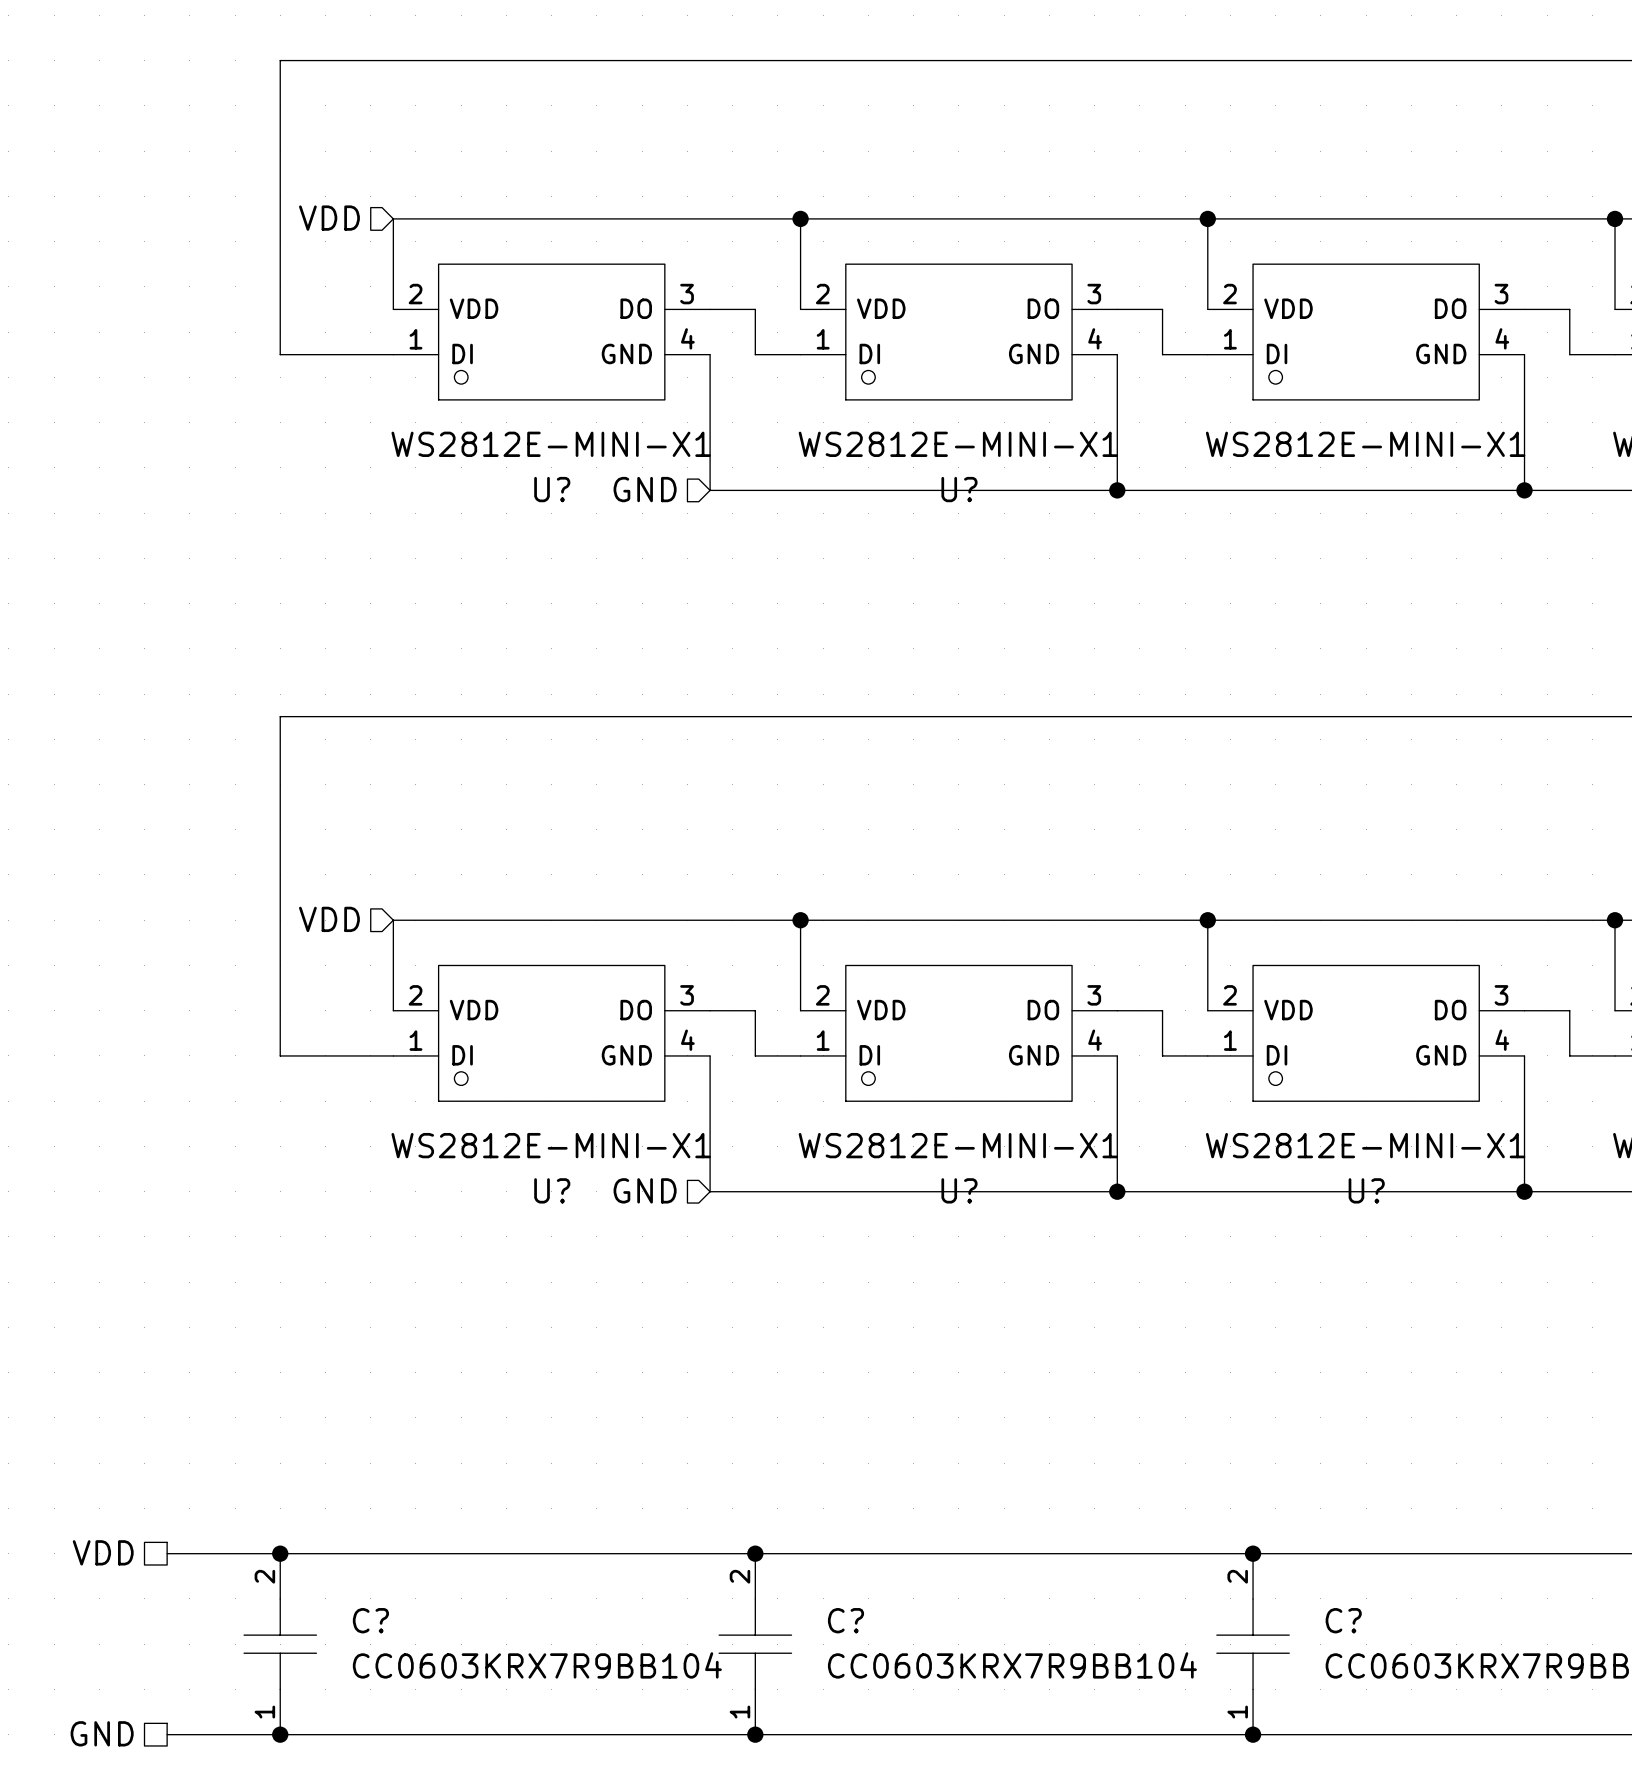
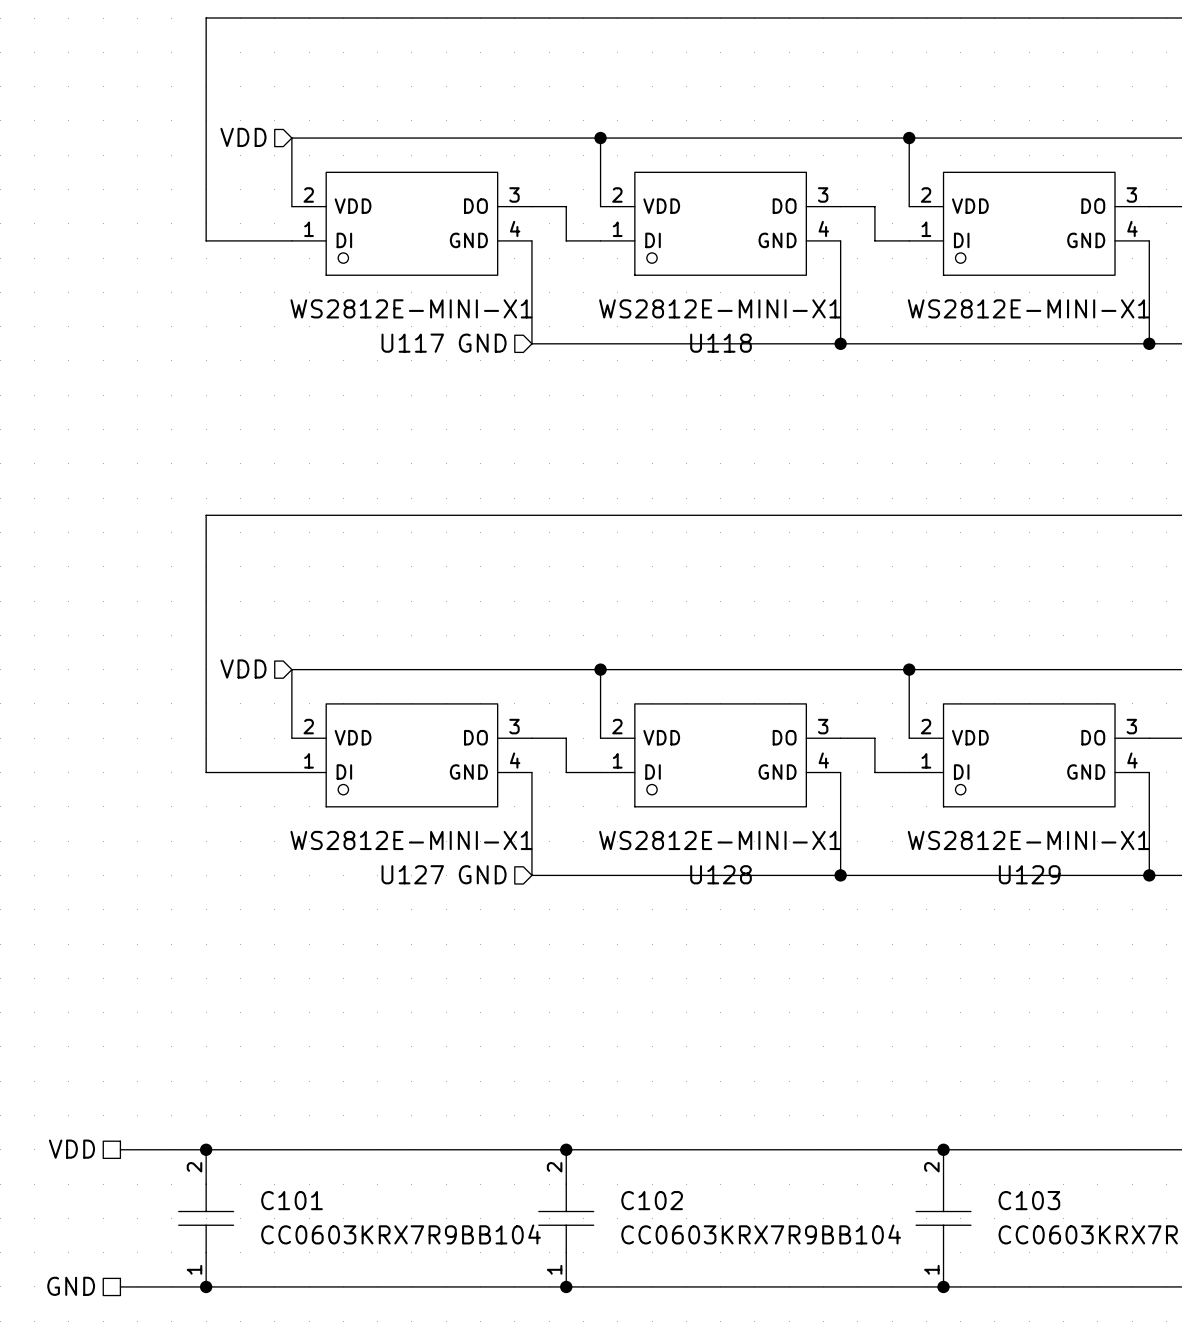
U? name: U? (552, 489) -> U117 (412, 343)
U? name: U? (959, 489) -> U118 (721, 343)
U? name: U? (552, 1190) -> U127 (412, 874)
U? name: U? (959, 1190) -> U128 (721, 874)
U? name: U? (1366, 1190) -> U129 (1029, 874)
C? name: C? (370, 1620) -> C101 (292, 1200)
C? name: C? (845, 1620) -> C102 (652, 1200)
C? name: C? (1343, 1620) -> C103 (1029, 1200)

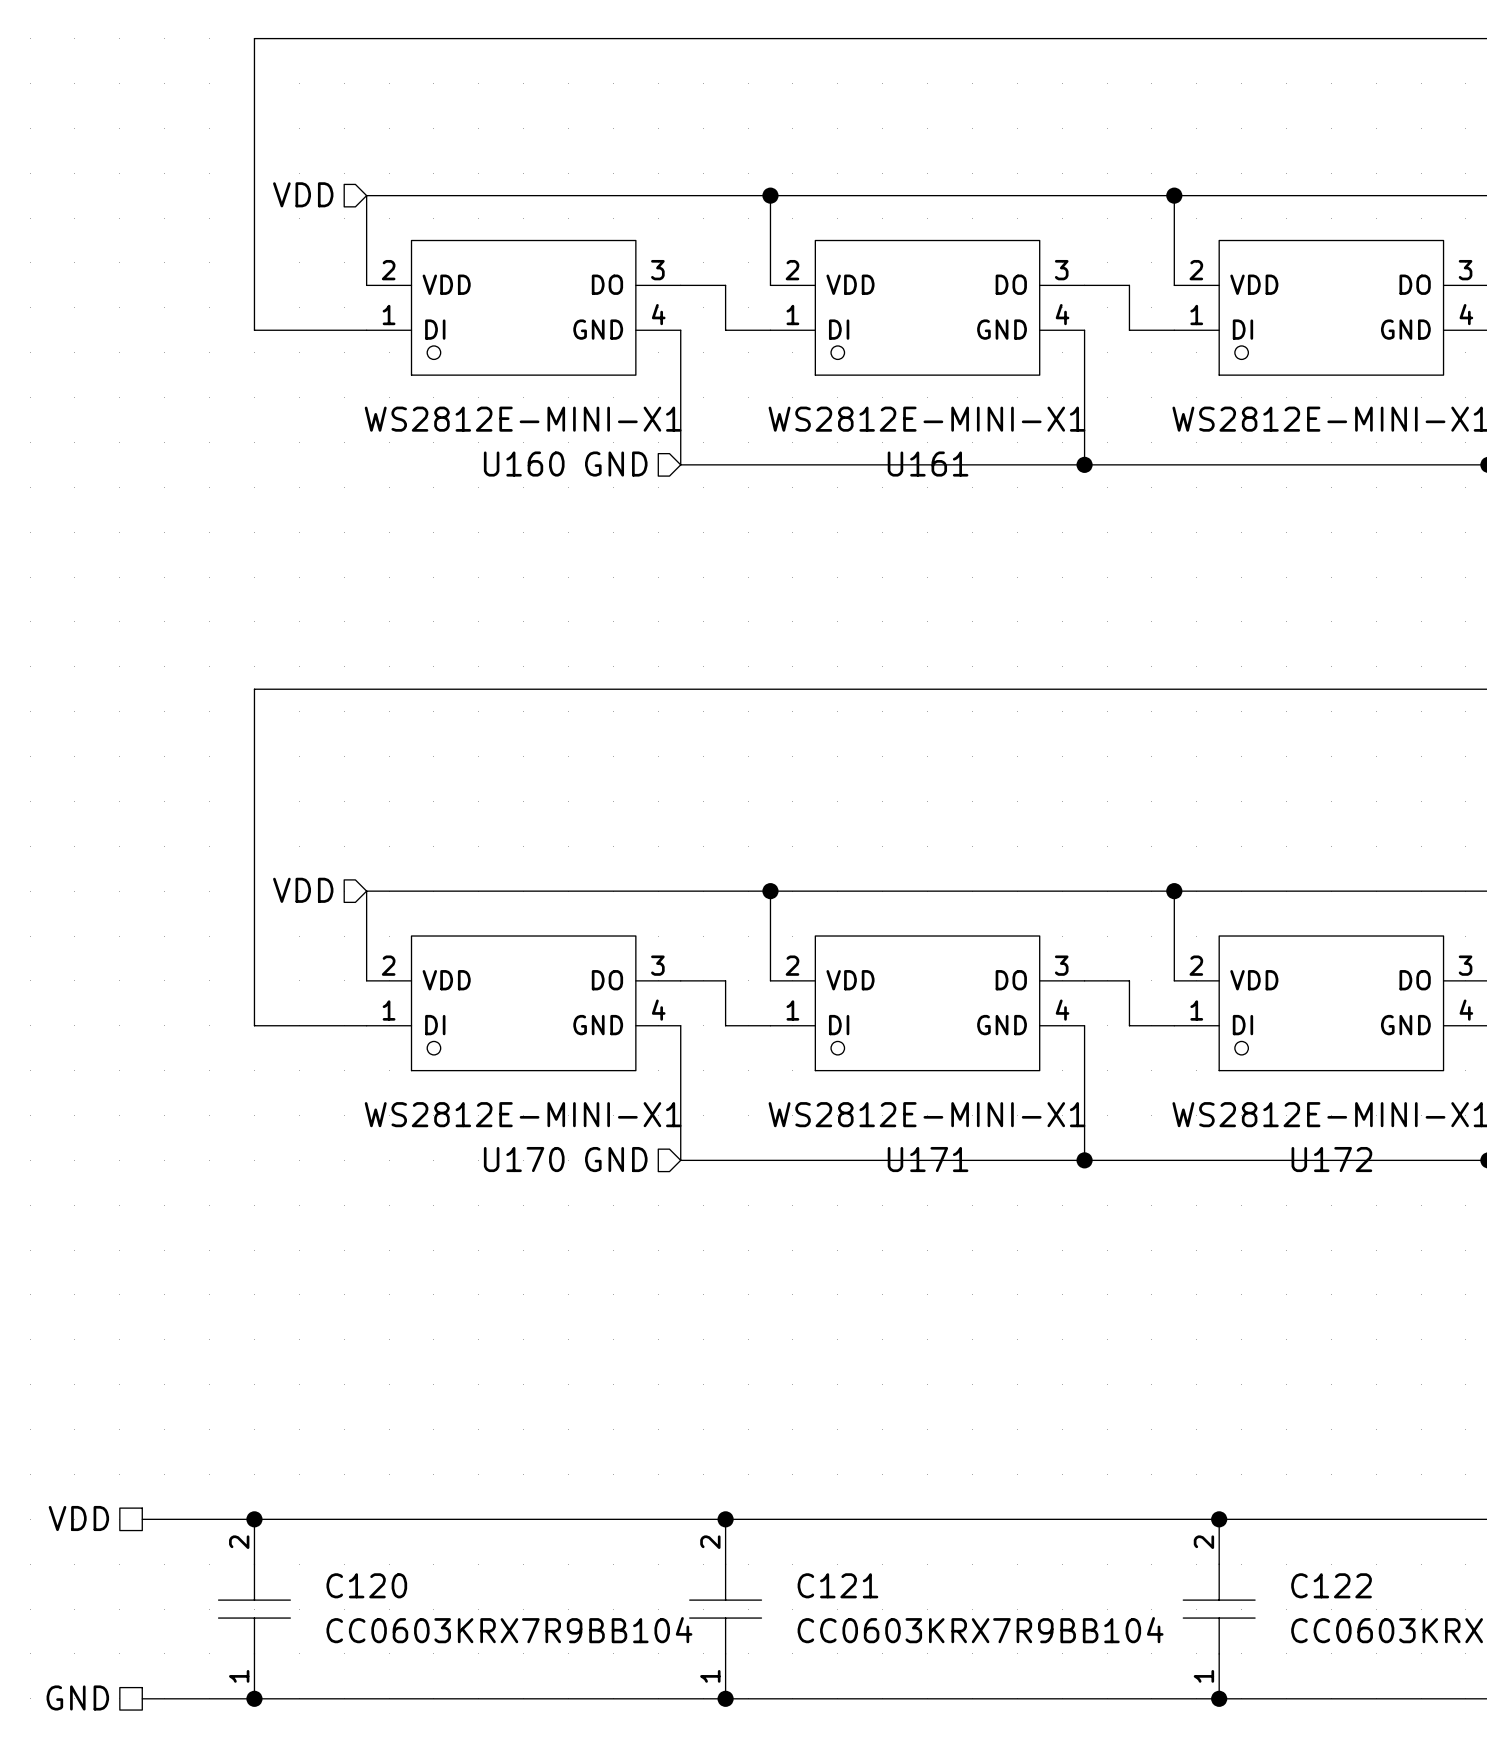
U117 name: U117 (412, 343) -> U160 (524, 464)
U118 name: U118 (721, 343) -> U161 (928, 464)
U127 name: U127 (412, 874) -> U170 (524, 1159)
U128 name: U128 (721, 874) -> U171 (928, 1159)
U129 name: U129 (1029, 874) -> U172 (1331, 1159)
C101 name: C101 (292, 1200) -> C120 (366, 1585)
C102 name: C102 (652, 1200) -> C121 (837, 1585)
C103 name: C103 (1029, 1200) -> C122 (1331, 1585)

